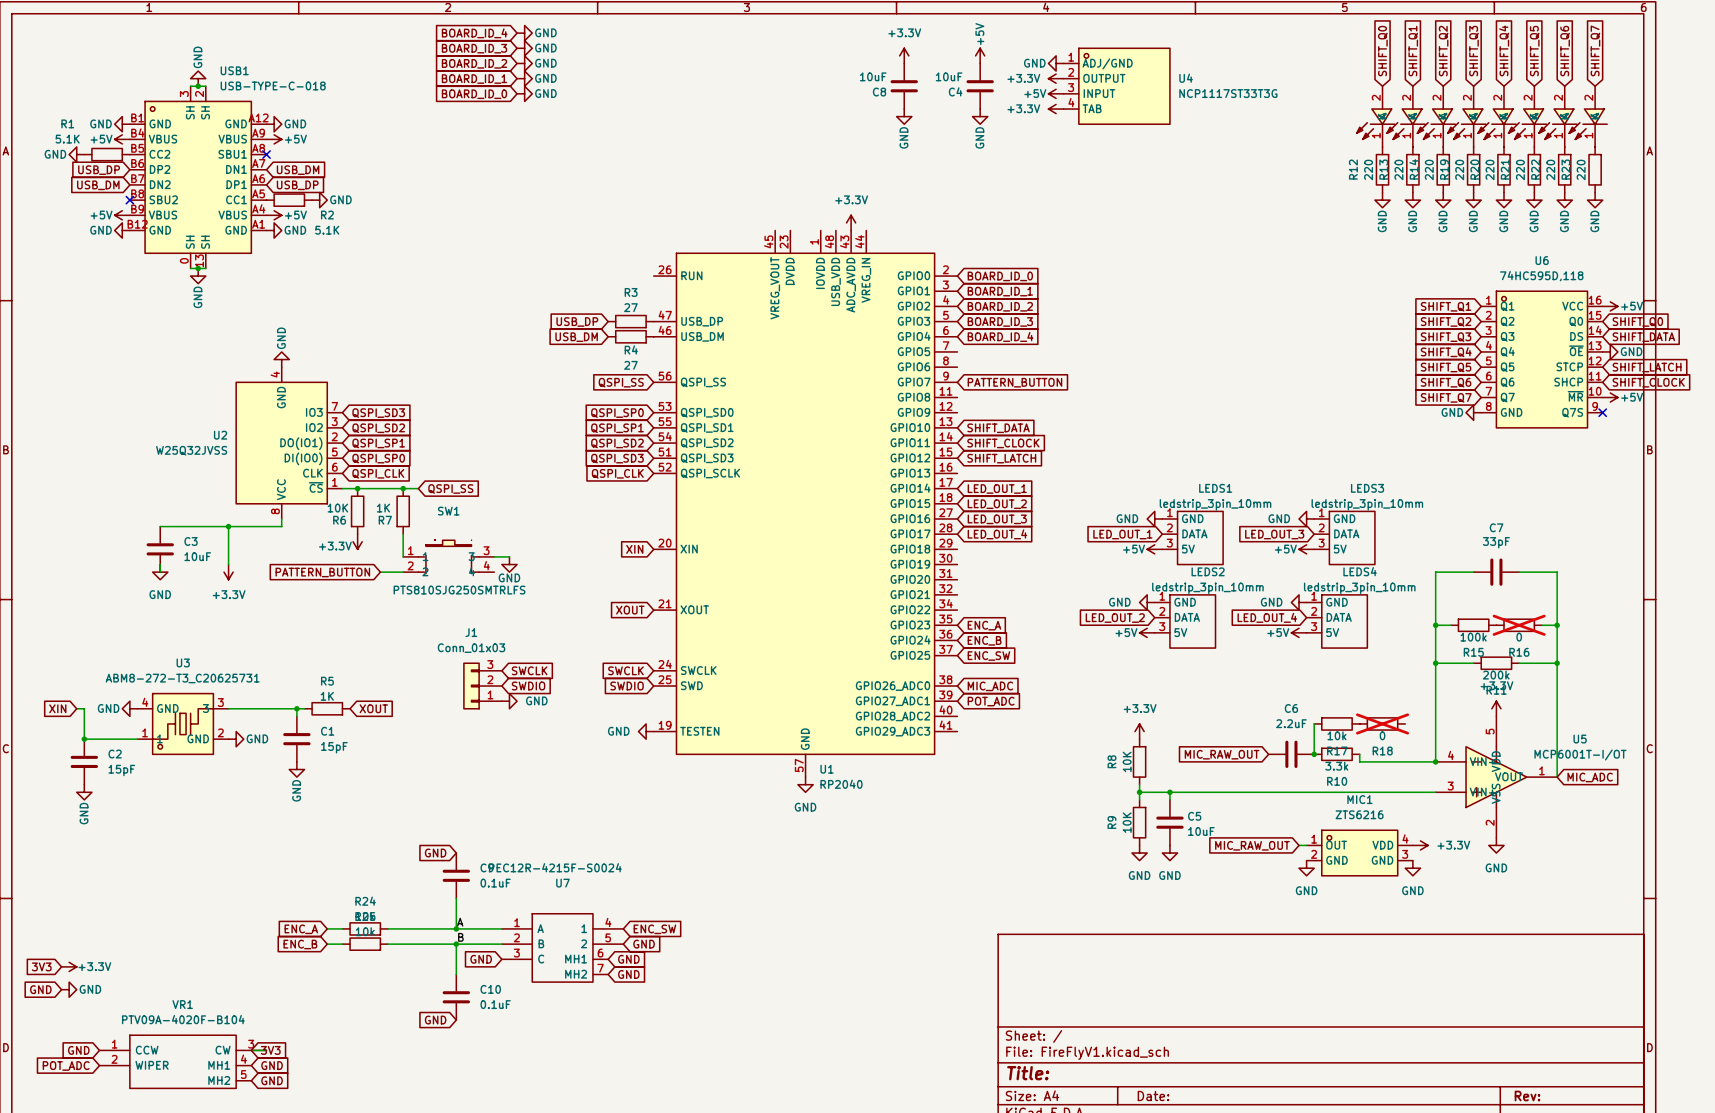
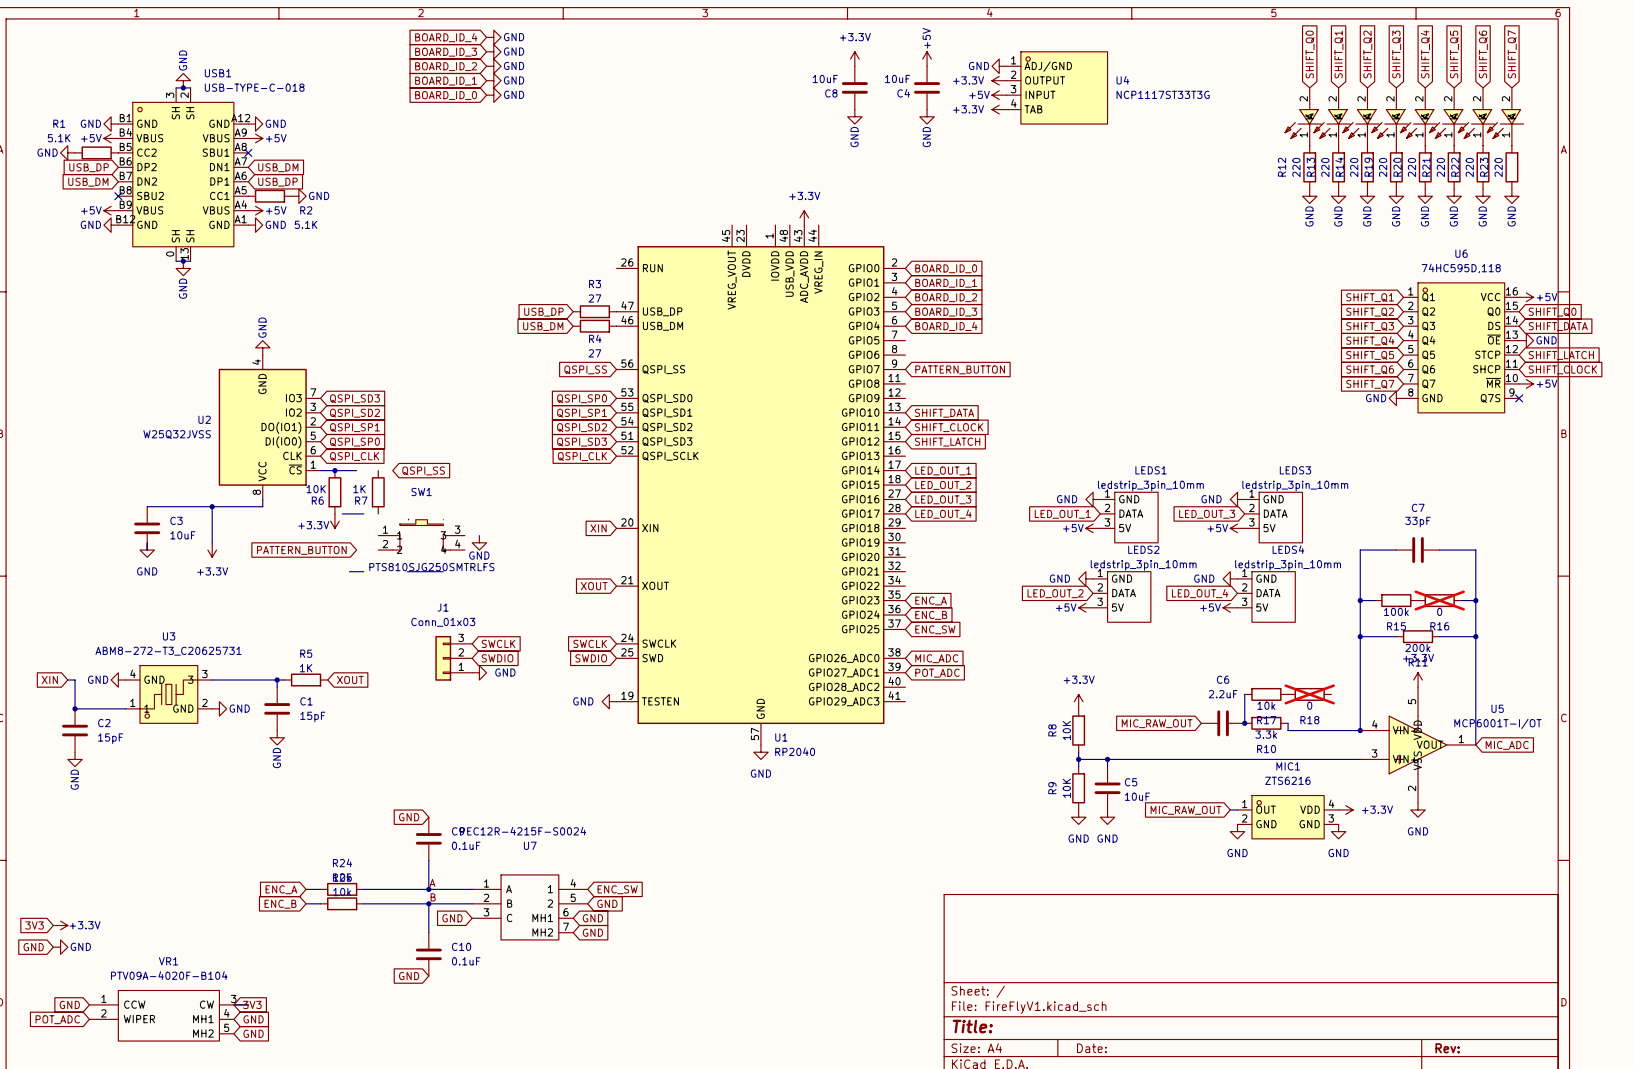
wire: (380, 488) (418, 488) -> (407, 571) (443, 571)
junction: (403, 488) -> none
wire: (403, 534) (403, 556) -> none
wire: (494, 556) (509, 556) -> (349, 571) (363, 571)
wire: (380, 572) (403, 572) -> (342, 513) (363, 513)

